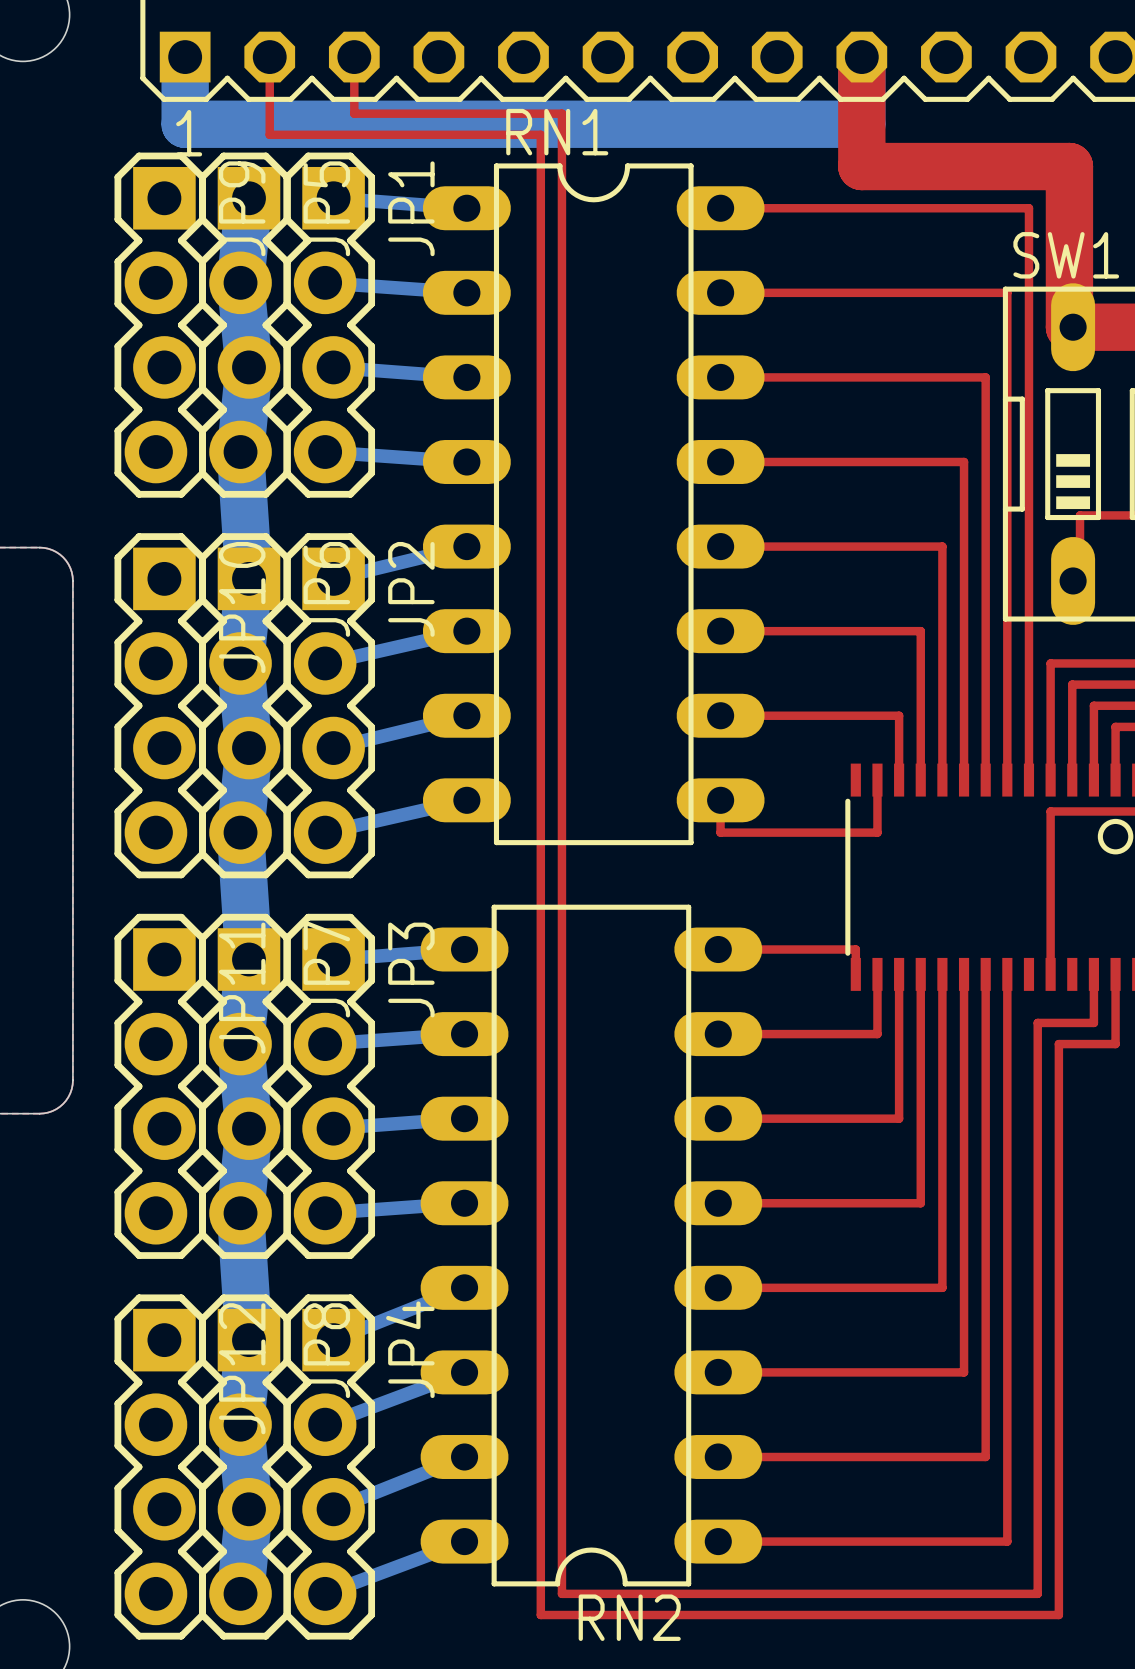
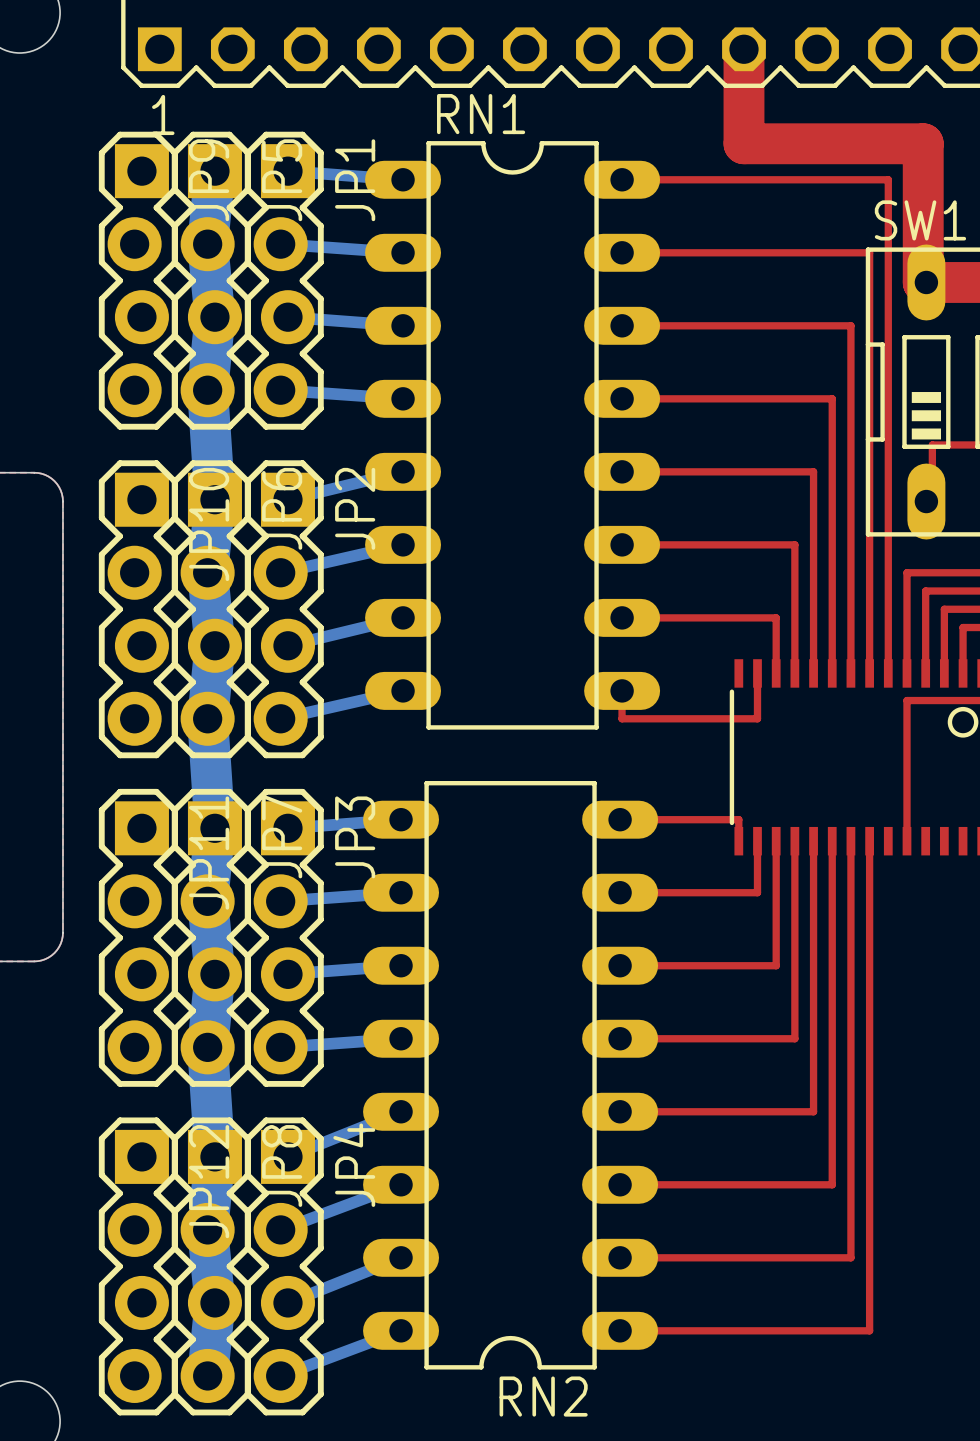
bottom track: (185, 57) (185, 124) (861, 124) (861, 57) -> none
top track: (269, 57) (269, 134) (540, 134) (540, 1615) (1058, 1615) (1058, 1044) (1115, 1044) (1115, 974) -> none
top track: (354, 57) (354, 113) (561, 113) (561, 1593) (1037, 1593) (1037, 1022) (1093, 1022) (1093, 974) -> none

